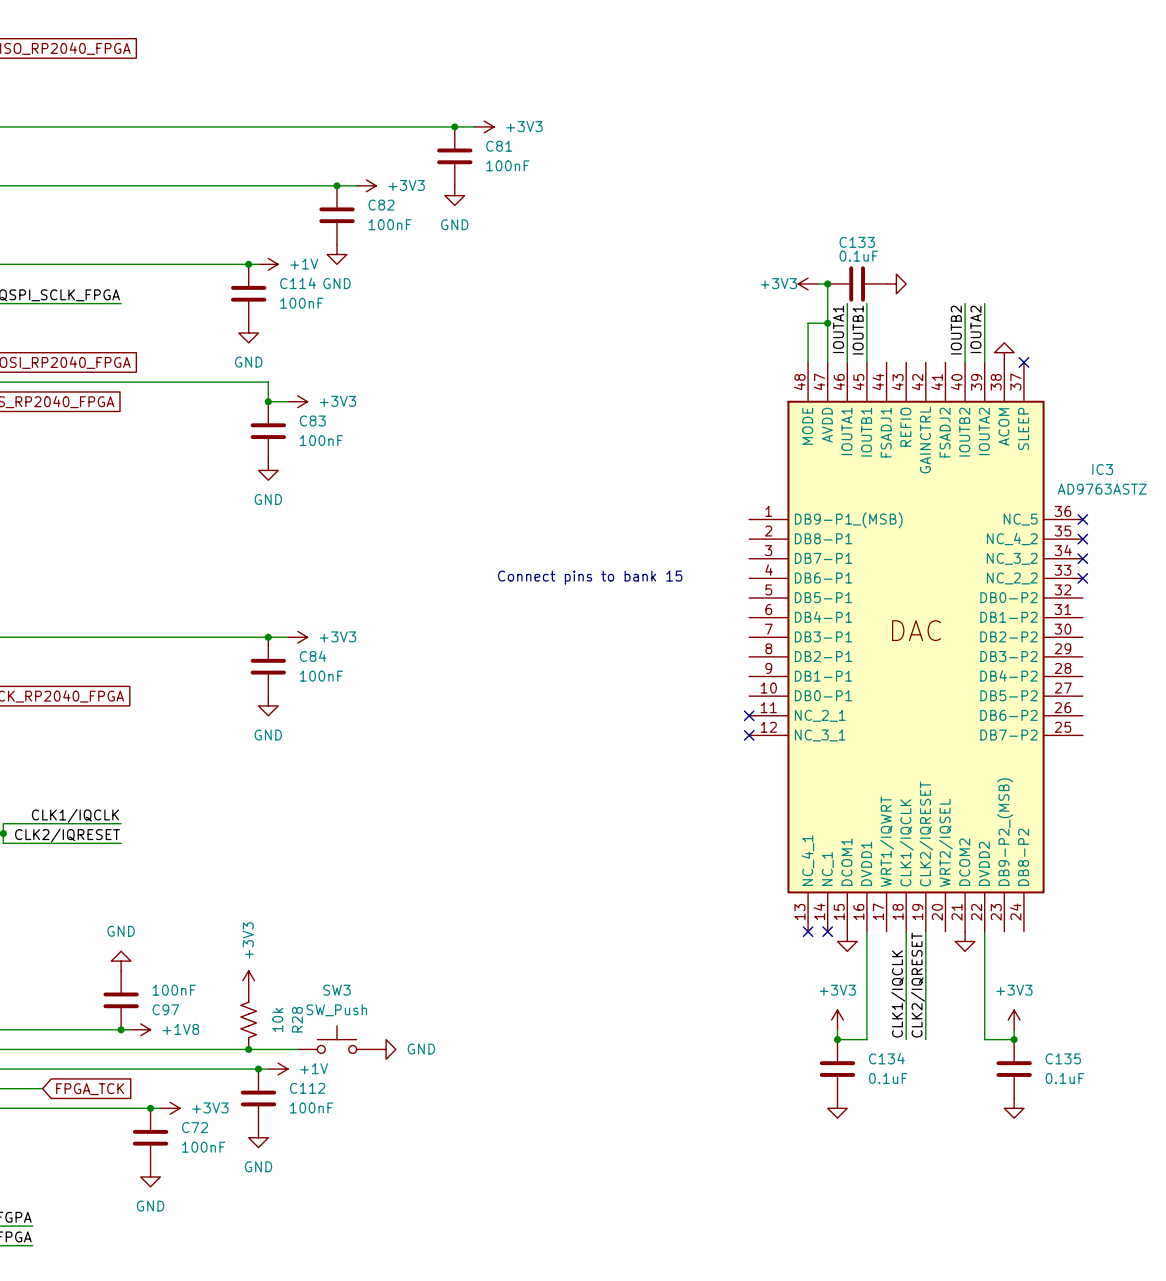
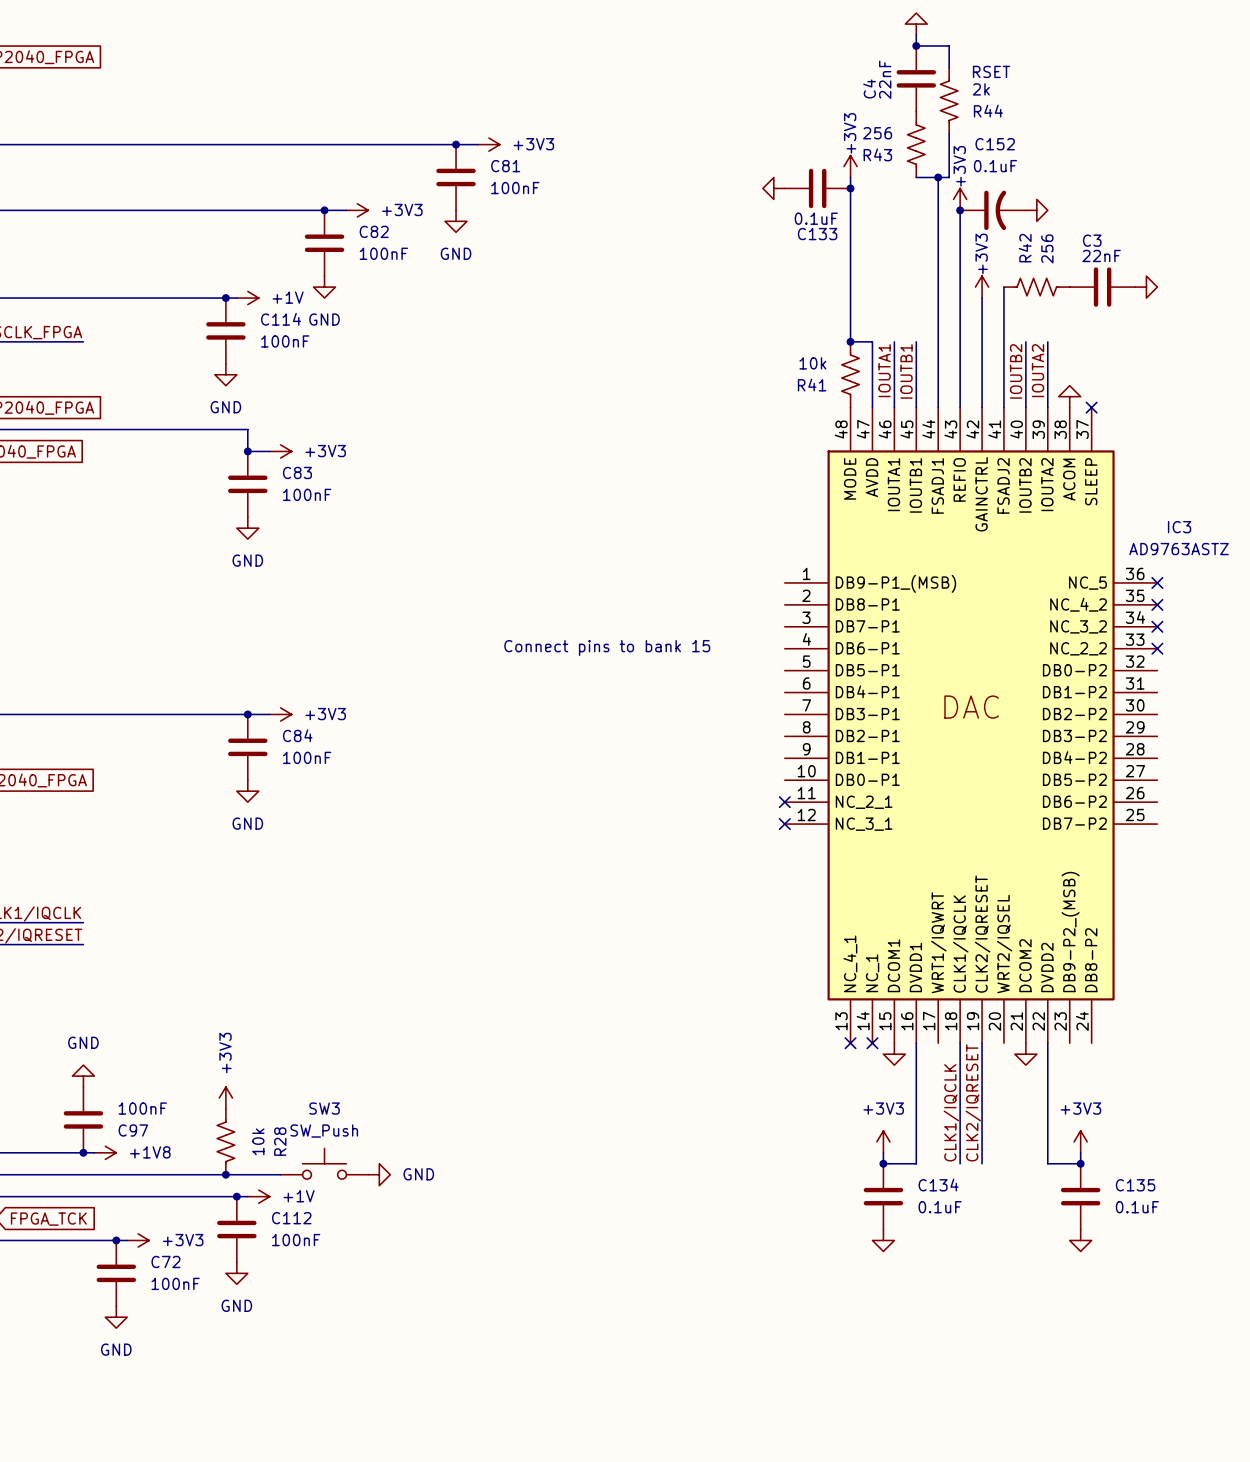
power symbol: none -> (916, 24)
wire: none -> (916, 35) (916, 45) (949, 45) (949, 67)
junction: none -> (916, 45)
text: none -> RSET (991, 71)
C4: none -> 22nF (916, 78)
R44: none -> 2k (949, 100)
wire: none -> (949, 133) (949, 177) (916, 177)
R43: none -> 256 (916, 144)
power symbol: none -> +3V3 (850, 166)
wire: none -> (938, 177) (938, 407)
junction: none -> (938, 177)
power symbol: none -> (773, 188)
junction: none -> (850, 188)
power symbol: none -> +3V3 (960, 199)
wire: none -> (960, 210) (960, 407)
junction: none -> (960, 210)
C152: none -> 0.1uF (993, 210)
power symbol: none -> (1036, 210)
C133 name position: C133 (857, 242) -> C133 (817, 234)
power symbol: none -> +3V3 (982, 287)
wire: none -> (1003, 287) (1003, 407)
R42: none -> 256 (1036, 287)
C3: none -> 22nF (1102, 287)
power symbol: none -> (1146, 287)
C133 value position: 0.1uF (858, 256) -> 0.1uF (816, 218)
wire: none -> (982, 298) (982, 407)
power symbol: +3V3 (808, 283) -> none
wire: (817, 283) (827, 283) (827, 303) -> (850, 177) (850, 341) (872, 341)
junction: (827, 283) -> none
C133 position: (857, 283) -> (817, 188)
power symbol: (896, 283) -> none
junction: none -> (850, 341)
wire: (827, 323) (808, 323) (808, 362) -> none
junction: (827, 323) -> none
R41: none -> 10k (850, 374)

